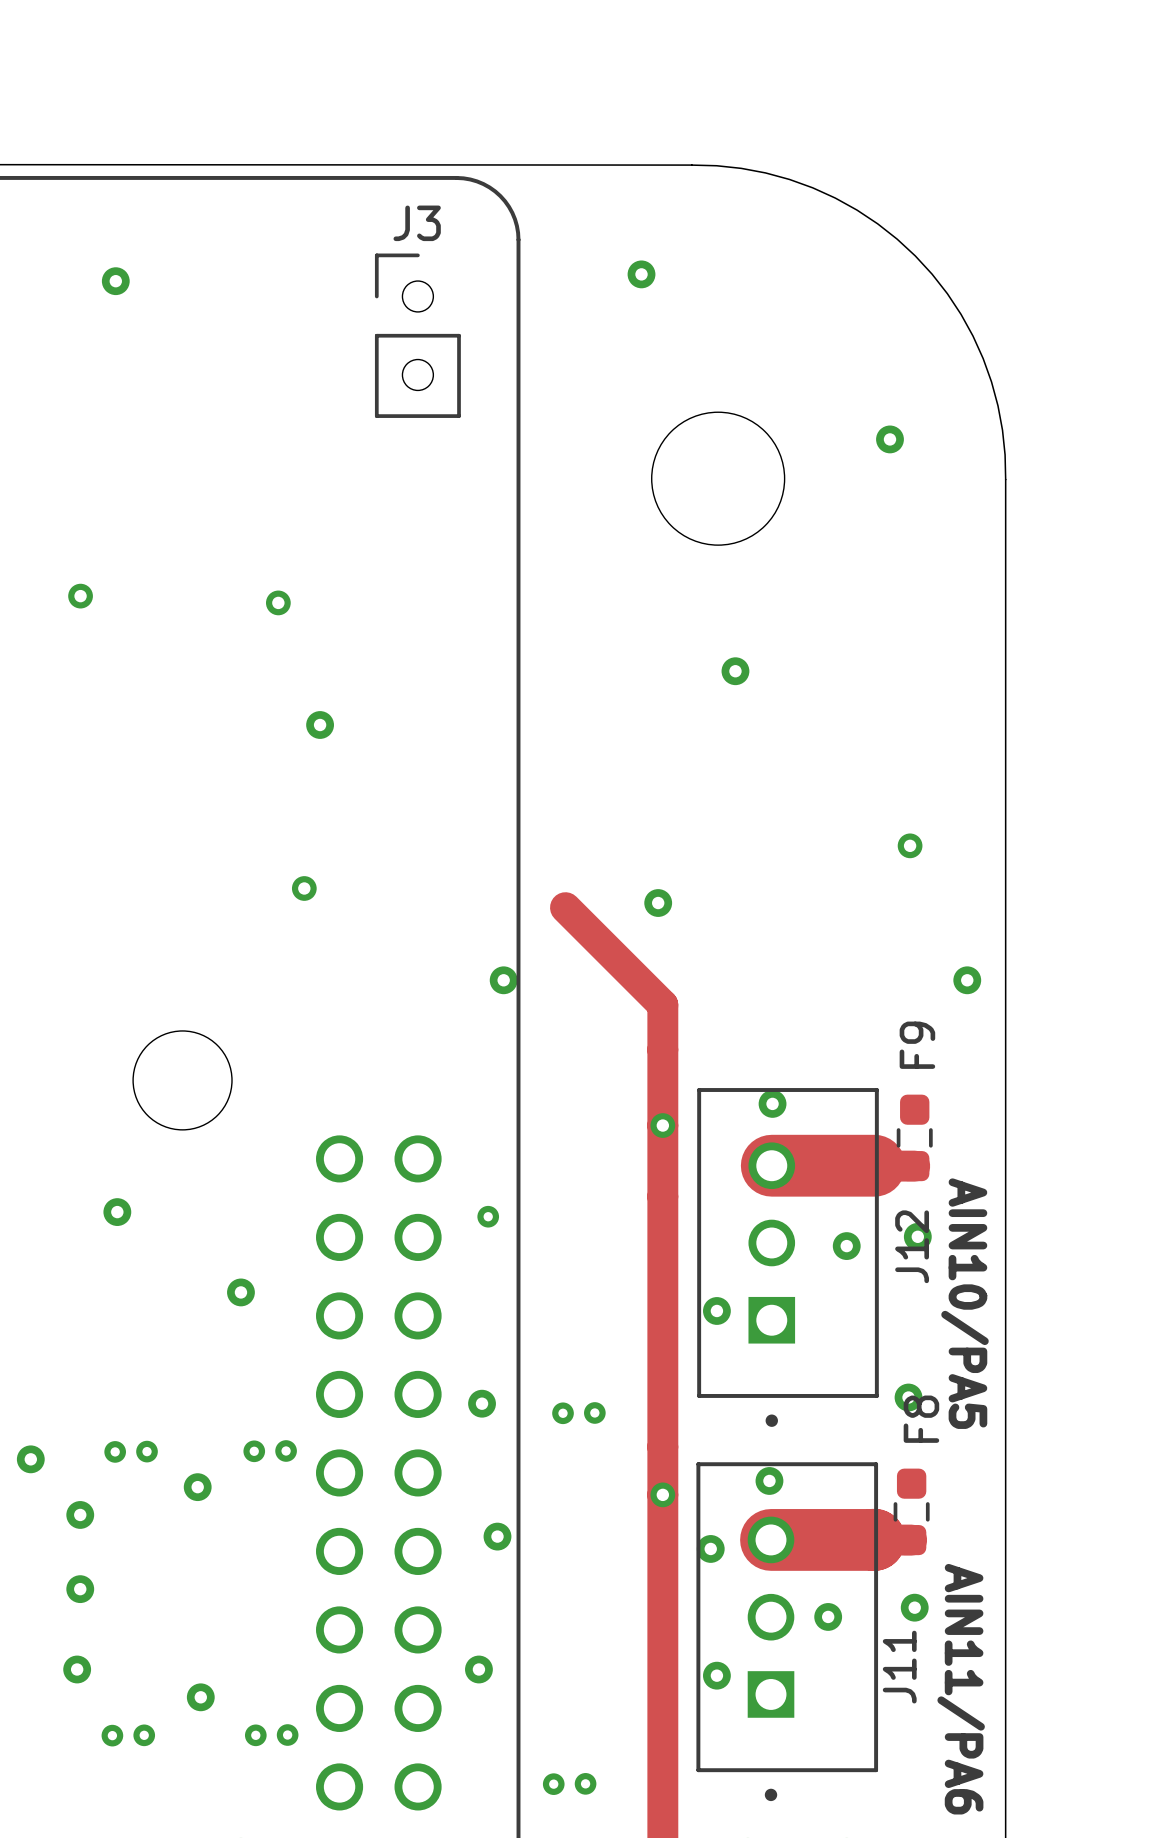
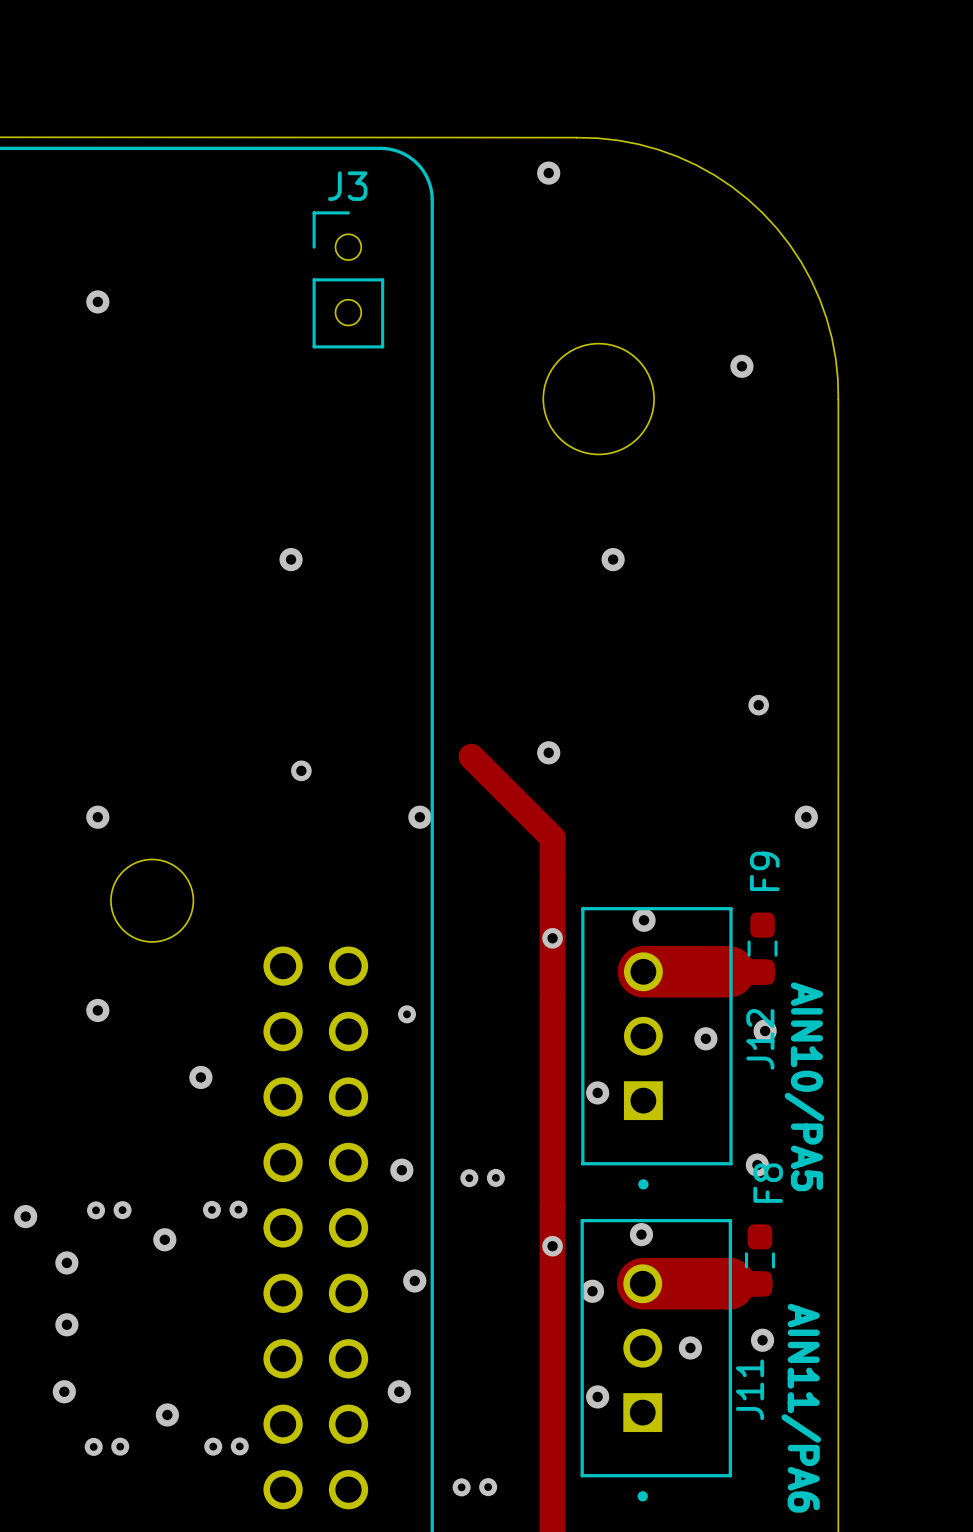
via position: (641, 274) -> (548, 173)
via position: (115, 281) -> (97, 301)
via: (80, 596) -> none
via: (278, 602) -> none
via position: (320, 725) -> (291, 559)
via position: (304, 888) -> (301, 770)
via: none -> (97, 817)

